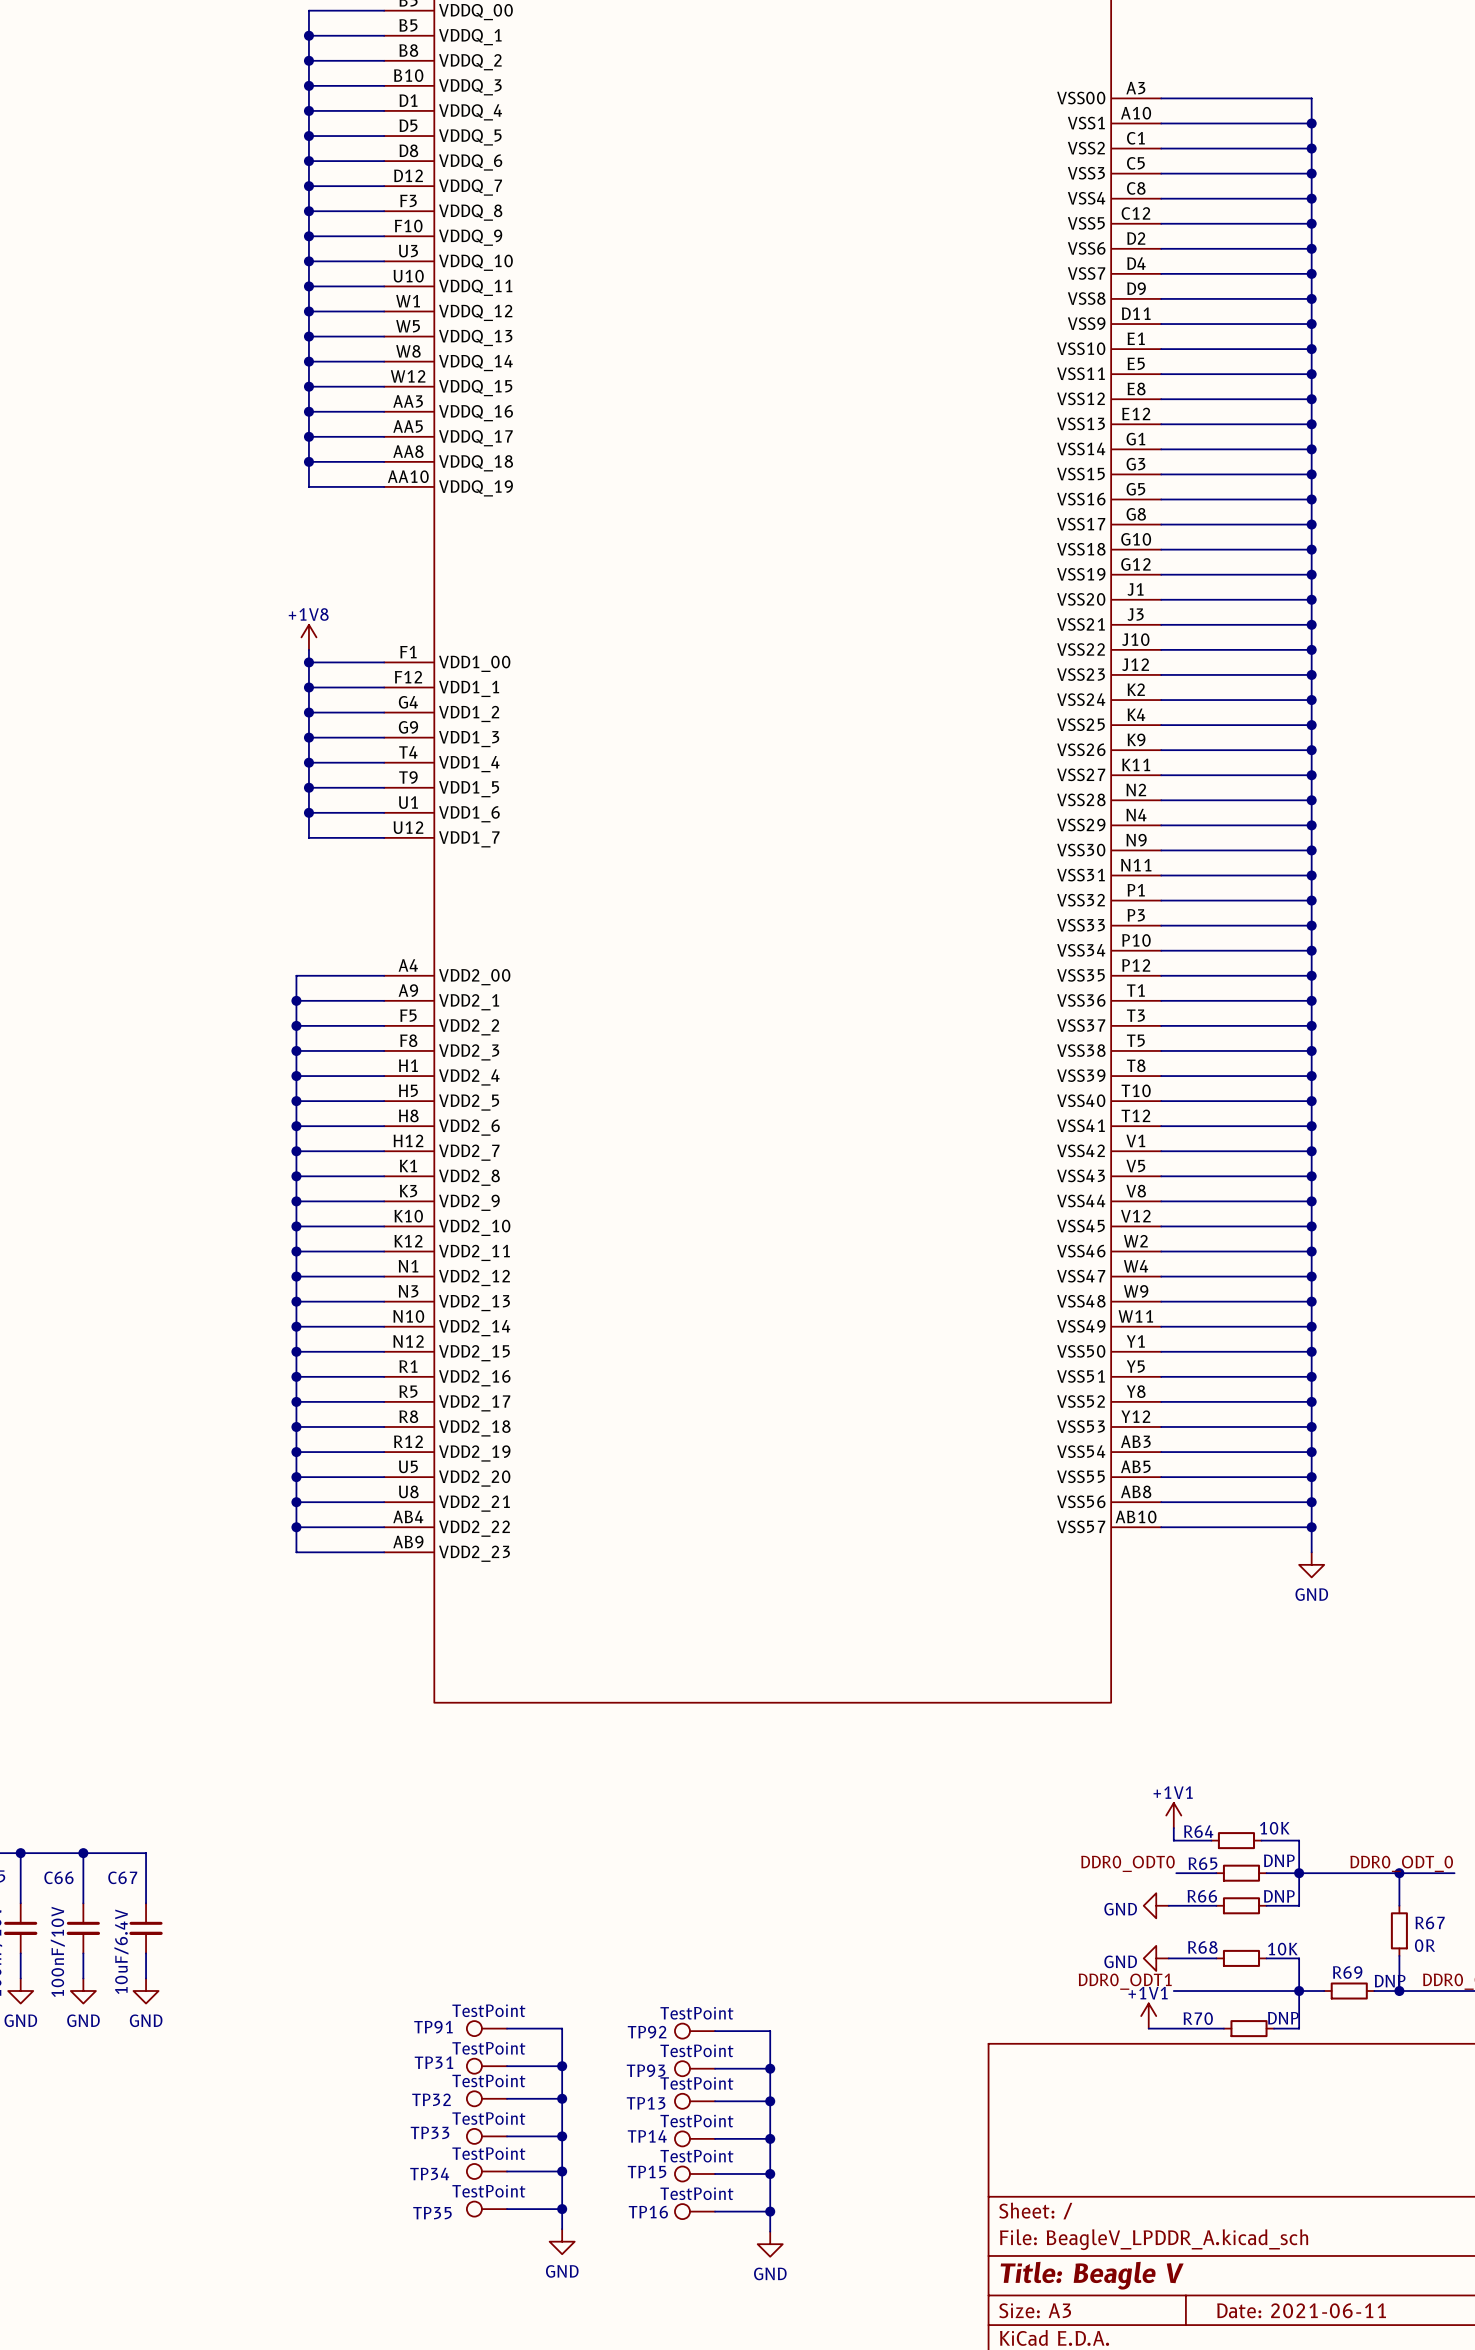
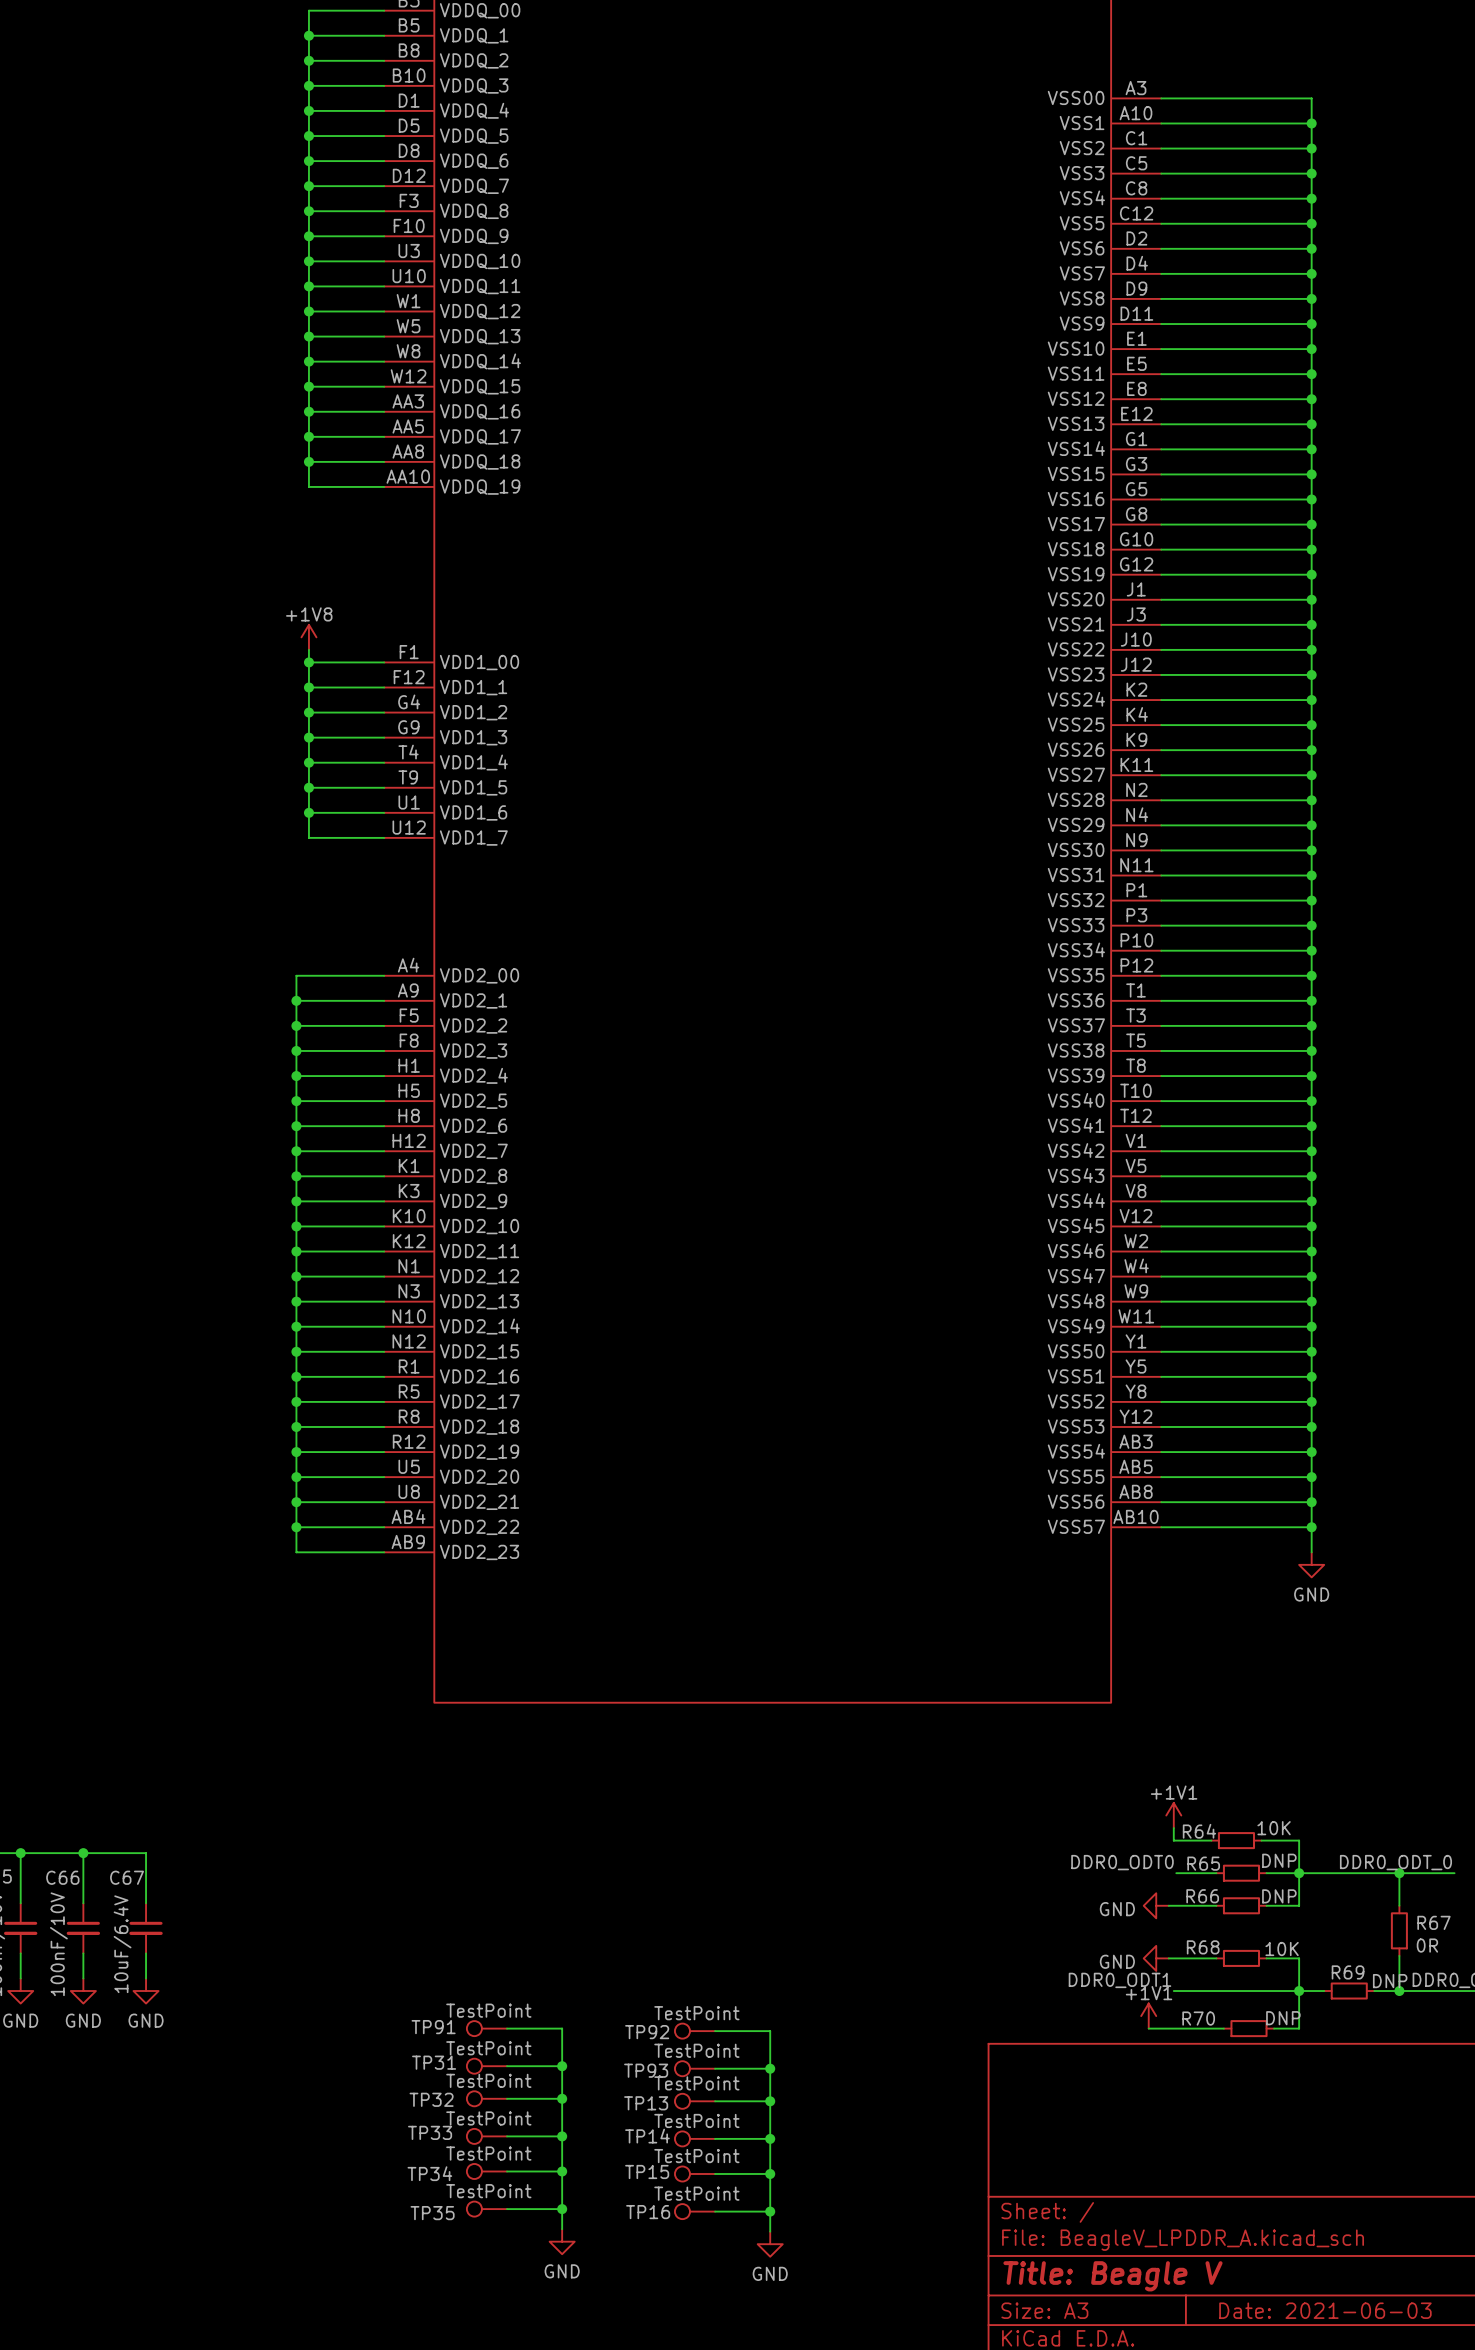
title block: Date: 2021-06-11 (1301, 2310) -> Date: 2021-06-03 (1325, 2310)

